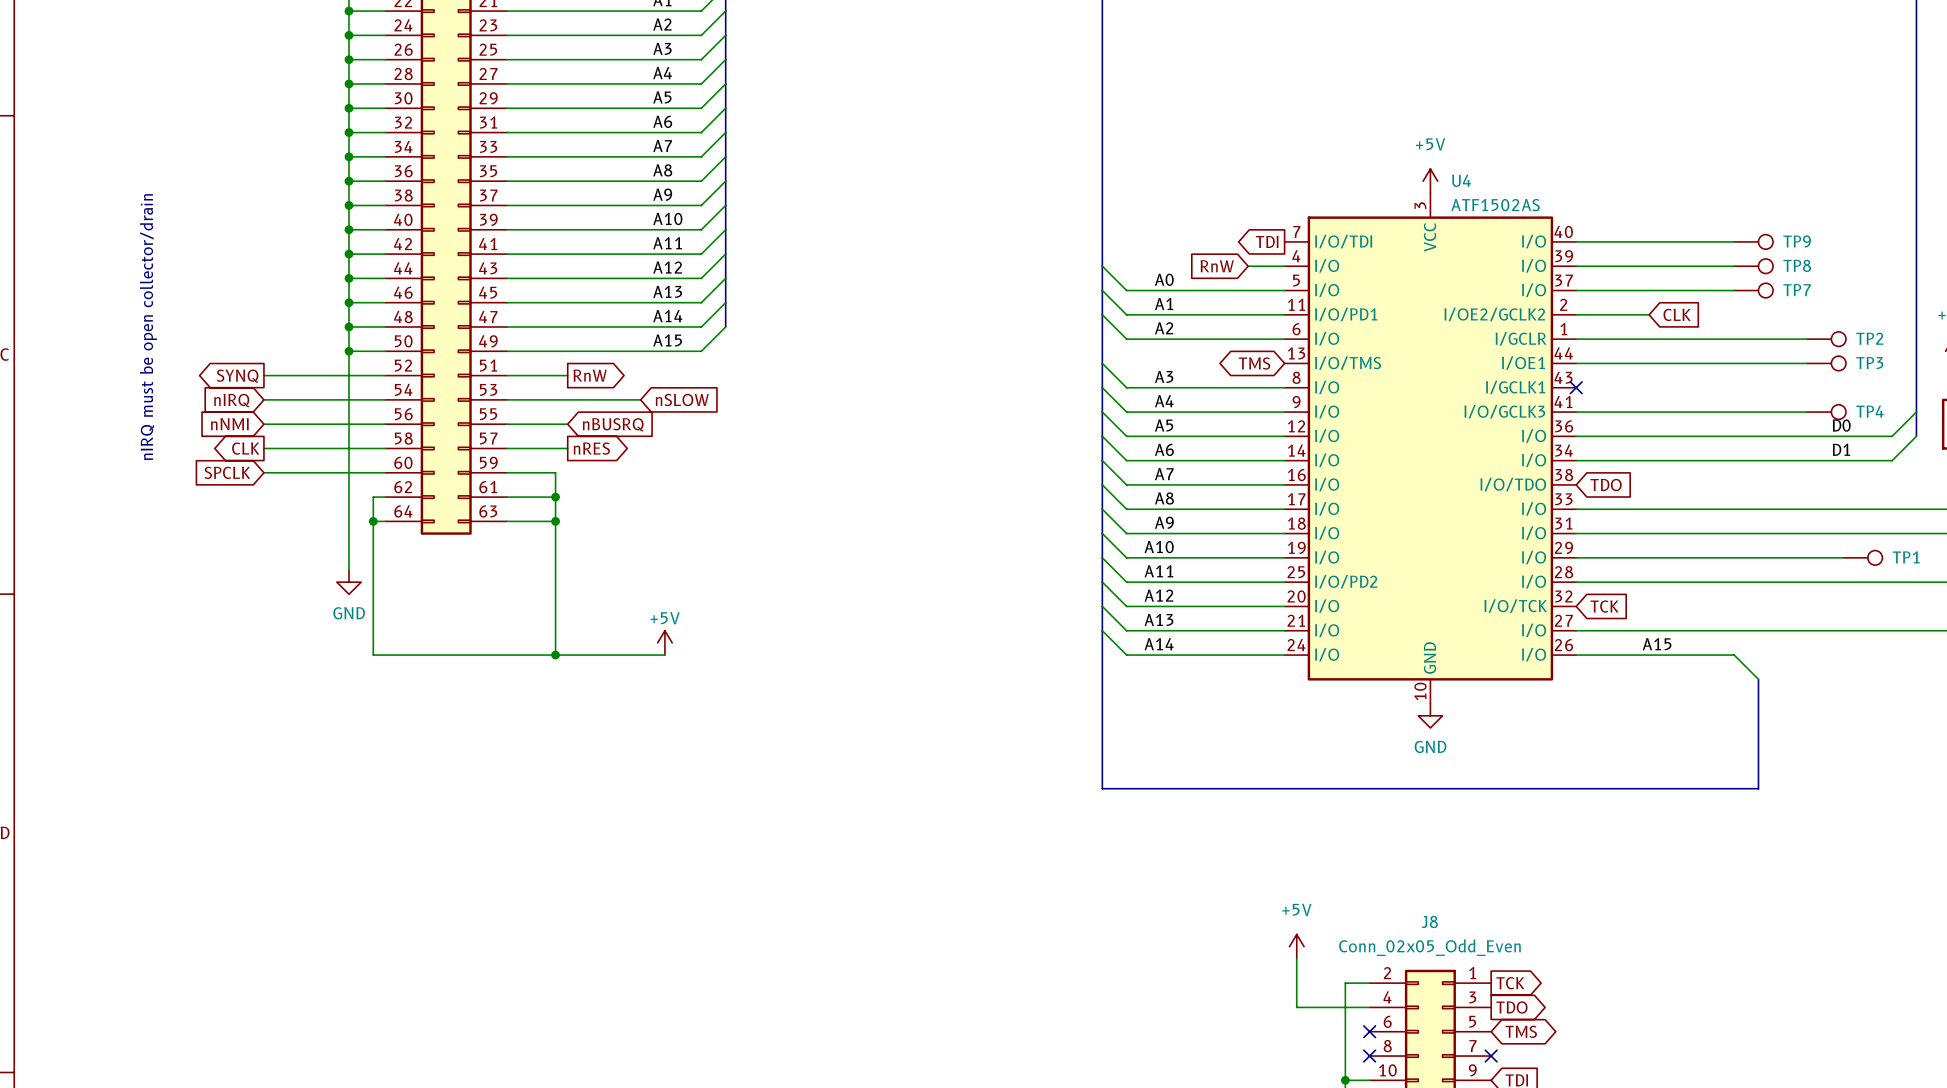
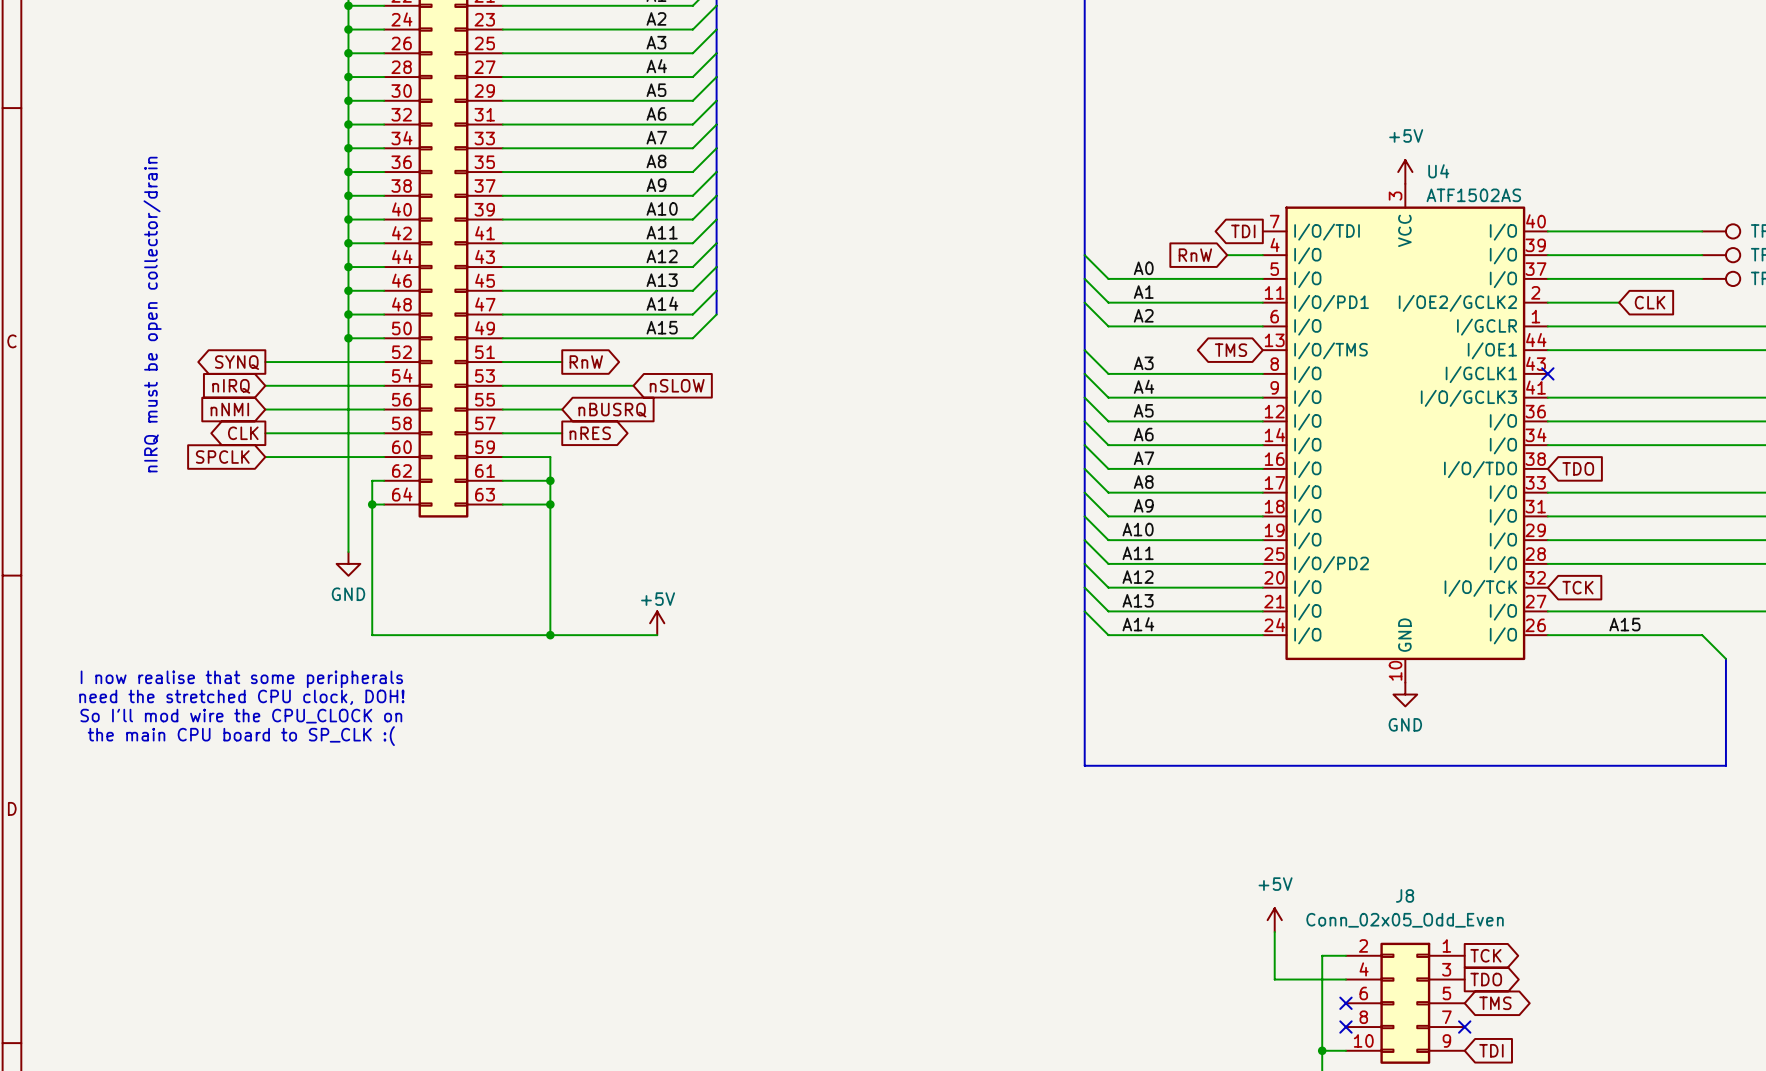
text: none -> I now realise that some peripherals (241, 679)
text: none -> need the stretched CPU clock, DOH! (241, 697)
text: none -> So I'll mod wire the CPU_CLOCK on (241, 716)
text: none -> the main CPU board to SP_CLK :( (241, 736)

